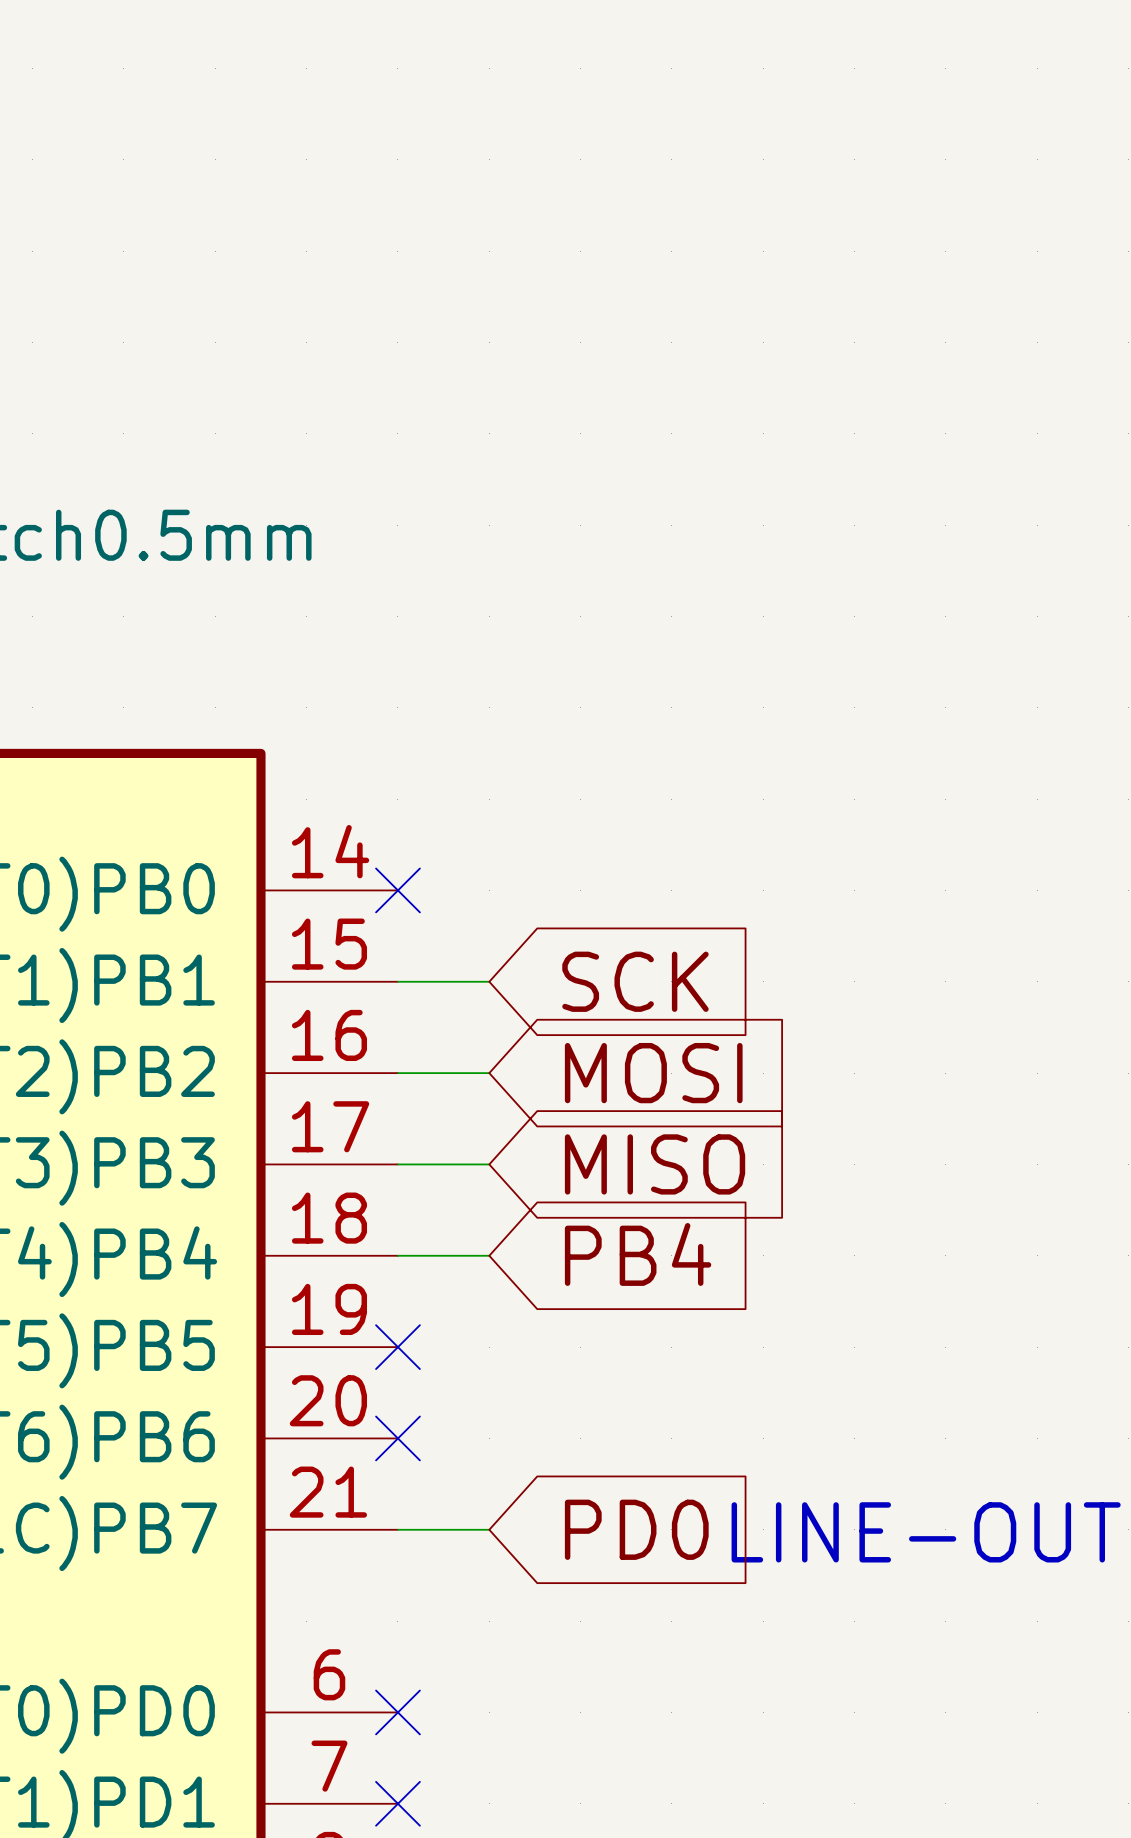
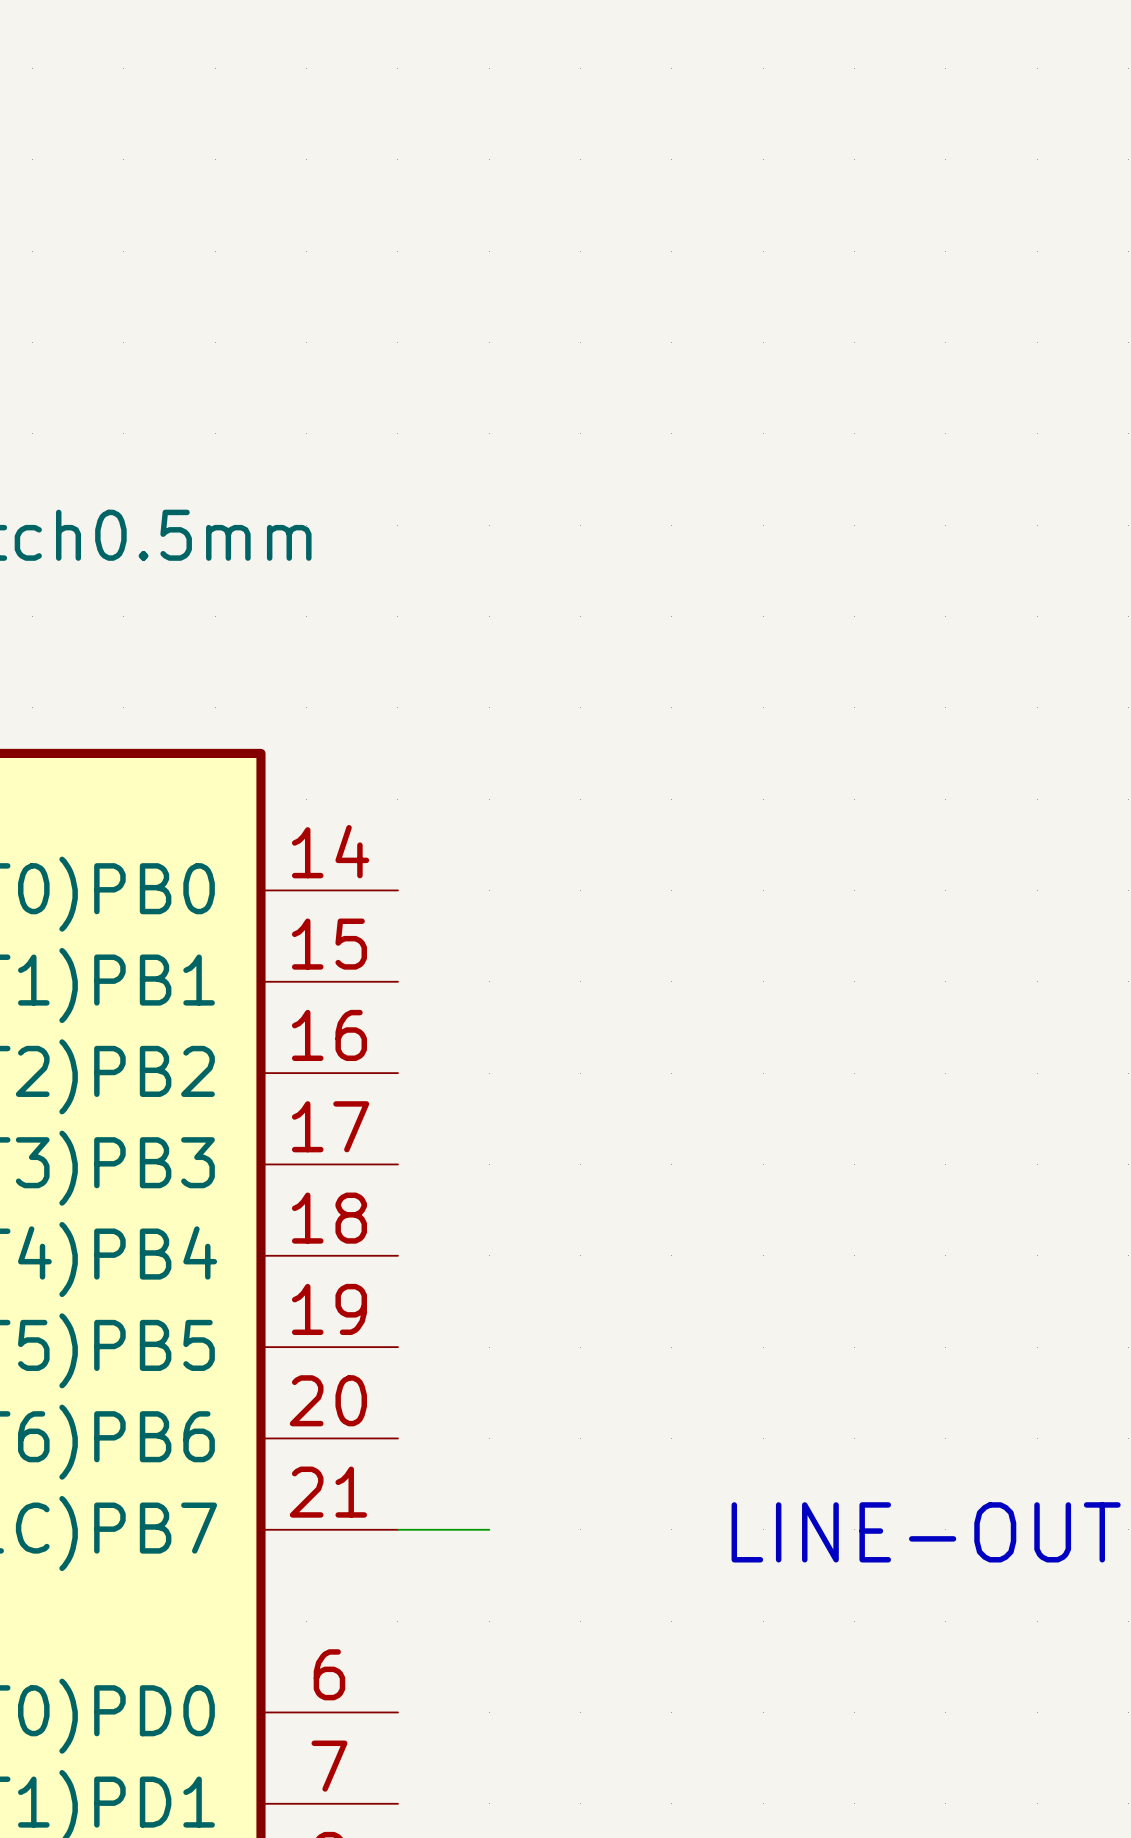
no-connect mark: (397, 890) -> none
wire: (397, 981) (489, 981) -> none
global label: SCK (635, 981) -> none
wire: (397, 1073) (489, 1073) -> none
global label: MOSI (653, 1073) -> none
wire: (397, 1164) (489, 1164) -> none
global label: MISO (655, 1164) -> none
global label: PB4 (638, 1254) -> none
wire: (397, 1255) (489, 1255) -> none
no-connect mark: (397, 1347) -> none
no-connect mark: (397, 1438) -> none
global label: PD0 (636, 1529) -> none
no-connect mark: (397, 1712) -> none
no-connect mark: (397, 1803) -> none

